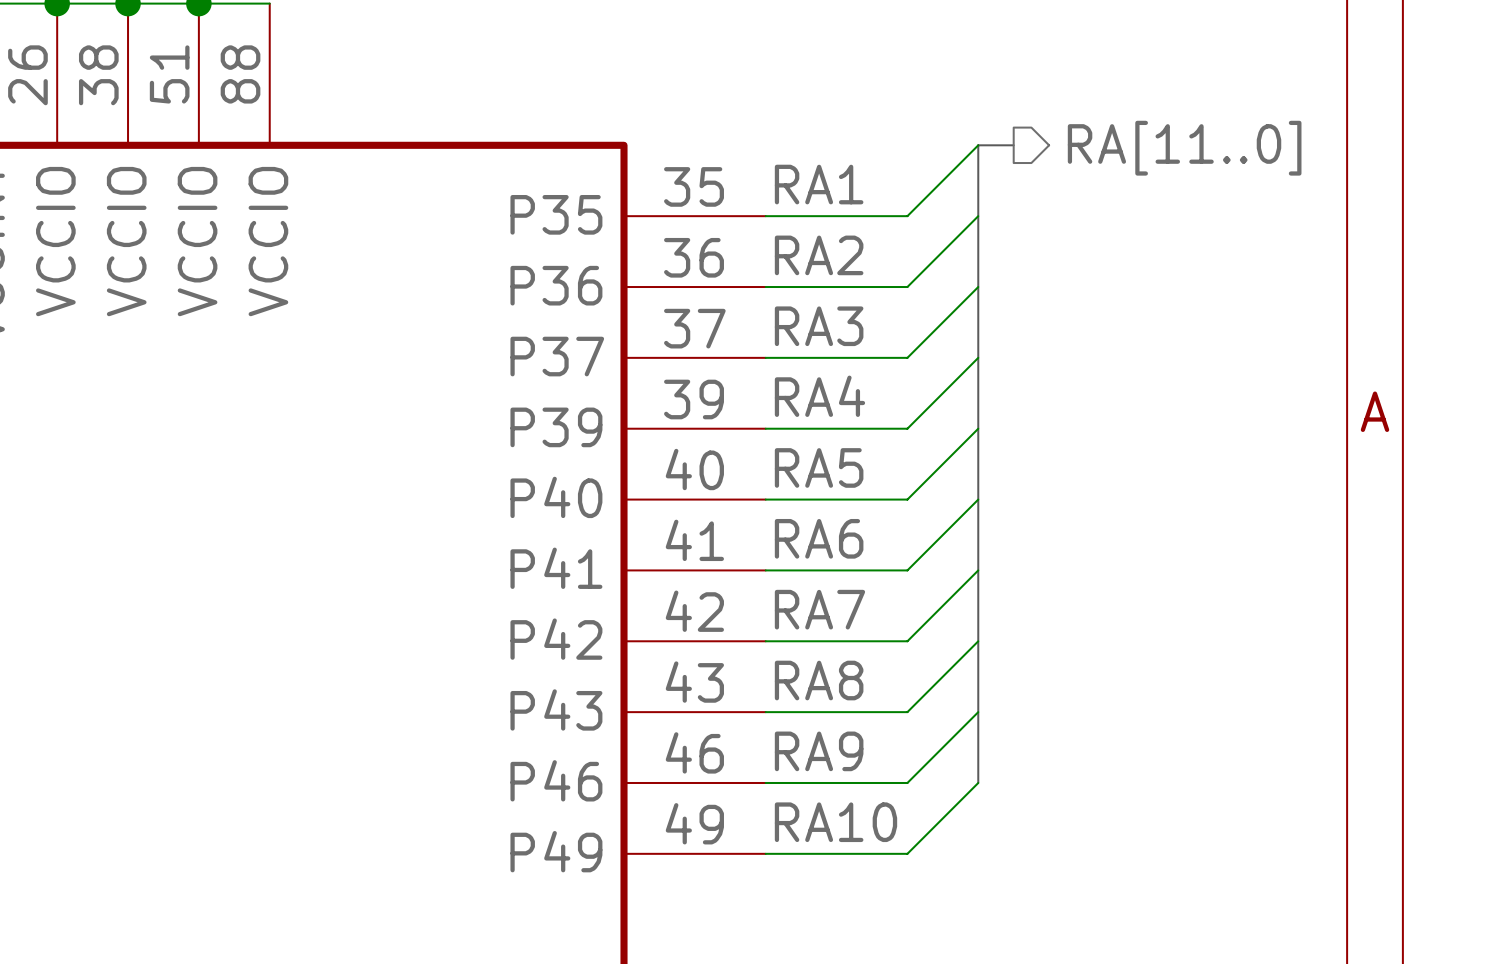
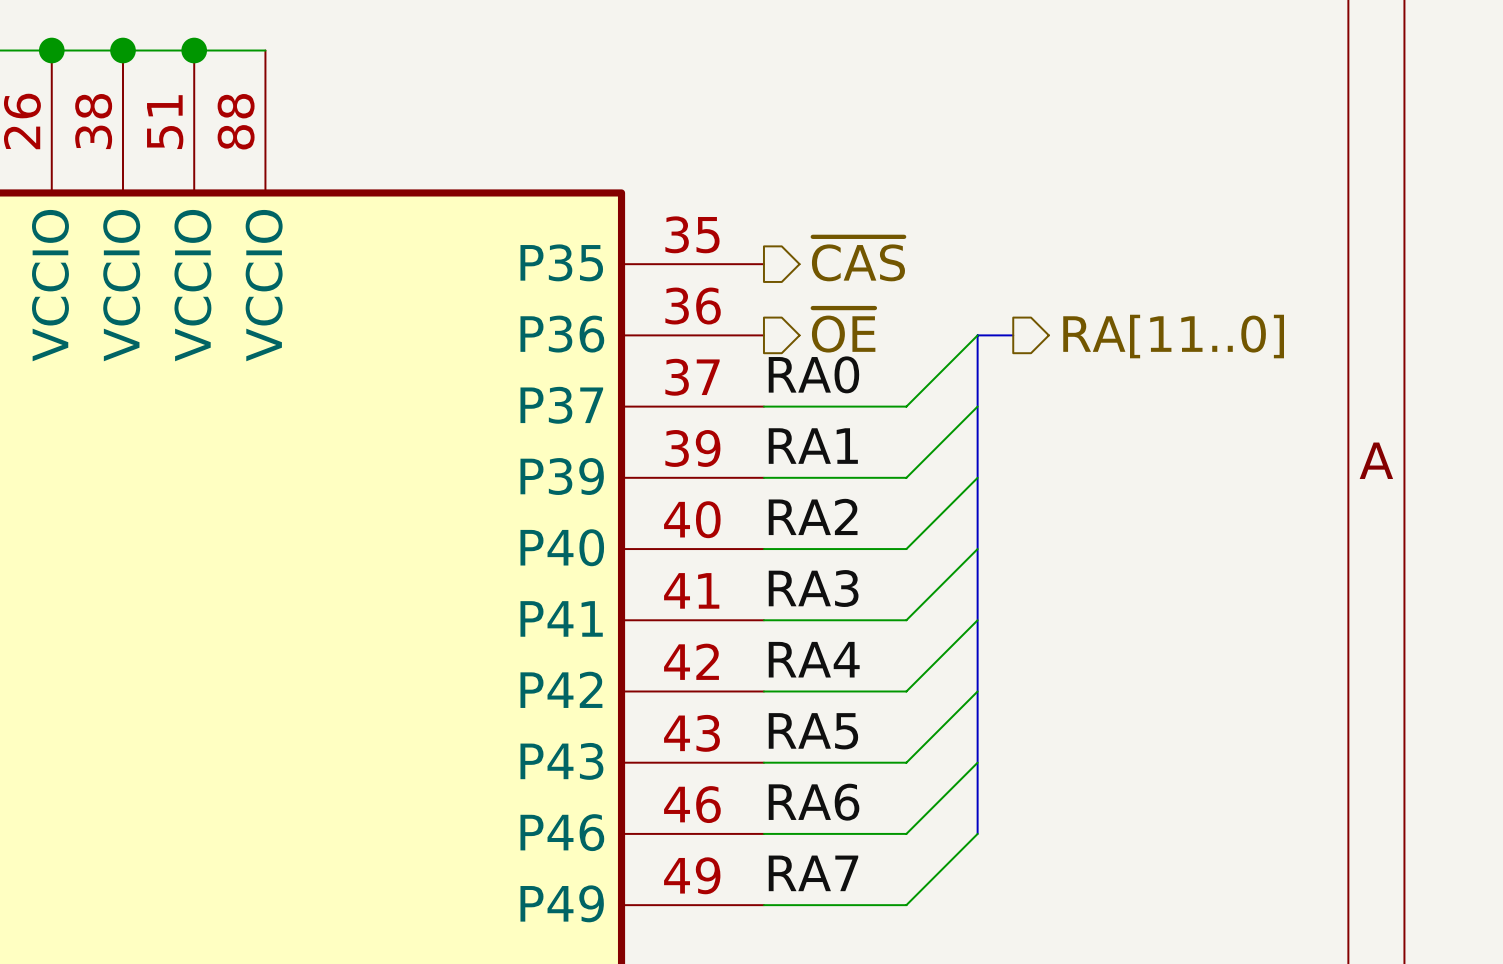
wire: (978, 145) (907, 216) (765, 216) -> none
bus: (1013, 145) (978, 145) (978, 287) -> (1013, 335) (977, 335)
hierarchical label position: RA[11..0] (1184, 148) -> RA[11..0] (1173, 336)
label: RA1 (819, 184) -> none
hierarchical label: none -> ~{CAS} (858, 259)
wire: (978, 216) (907, 287) (765, 287) -> none
label: RA2 (819, 255) -> none
hierarchical label: none -> ~{OE} (843, 330)
label: RA3 (819, 326) -> RA0 (813, 374)
label: RA4 (819, 396) -> RA1 (813, 446)
label: RA5 (819, 467) -> RA2 (813, 516)
label: RA6 (819, 538) -> RA3 (813, 588)
label: RA7 (819, 609) -> RA4 (814, 659)
label: RA8 (819, 680) -> RA5 (813, 731)
label: RA9 (819, 751) -> RA6 (814, 802)
label: RA10 (835, 822) -> RA7 (813, 873)

